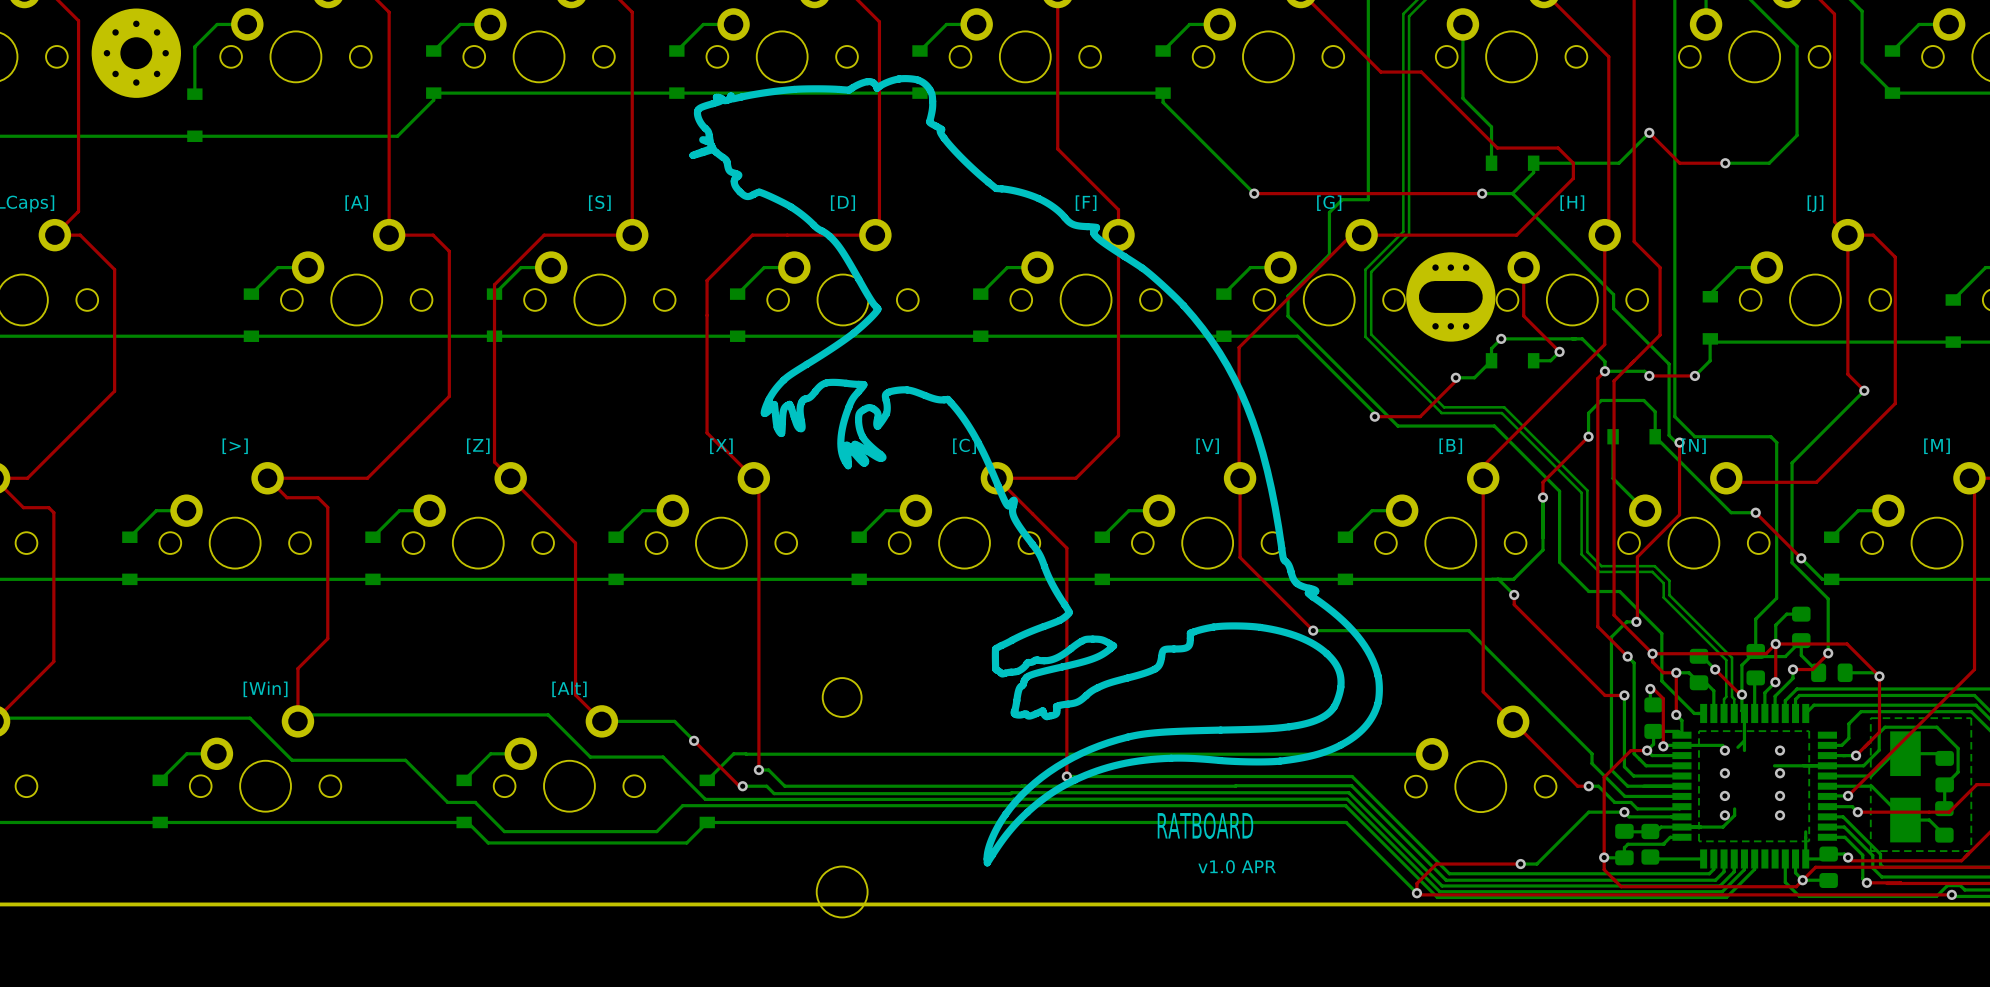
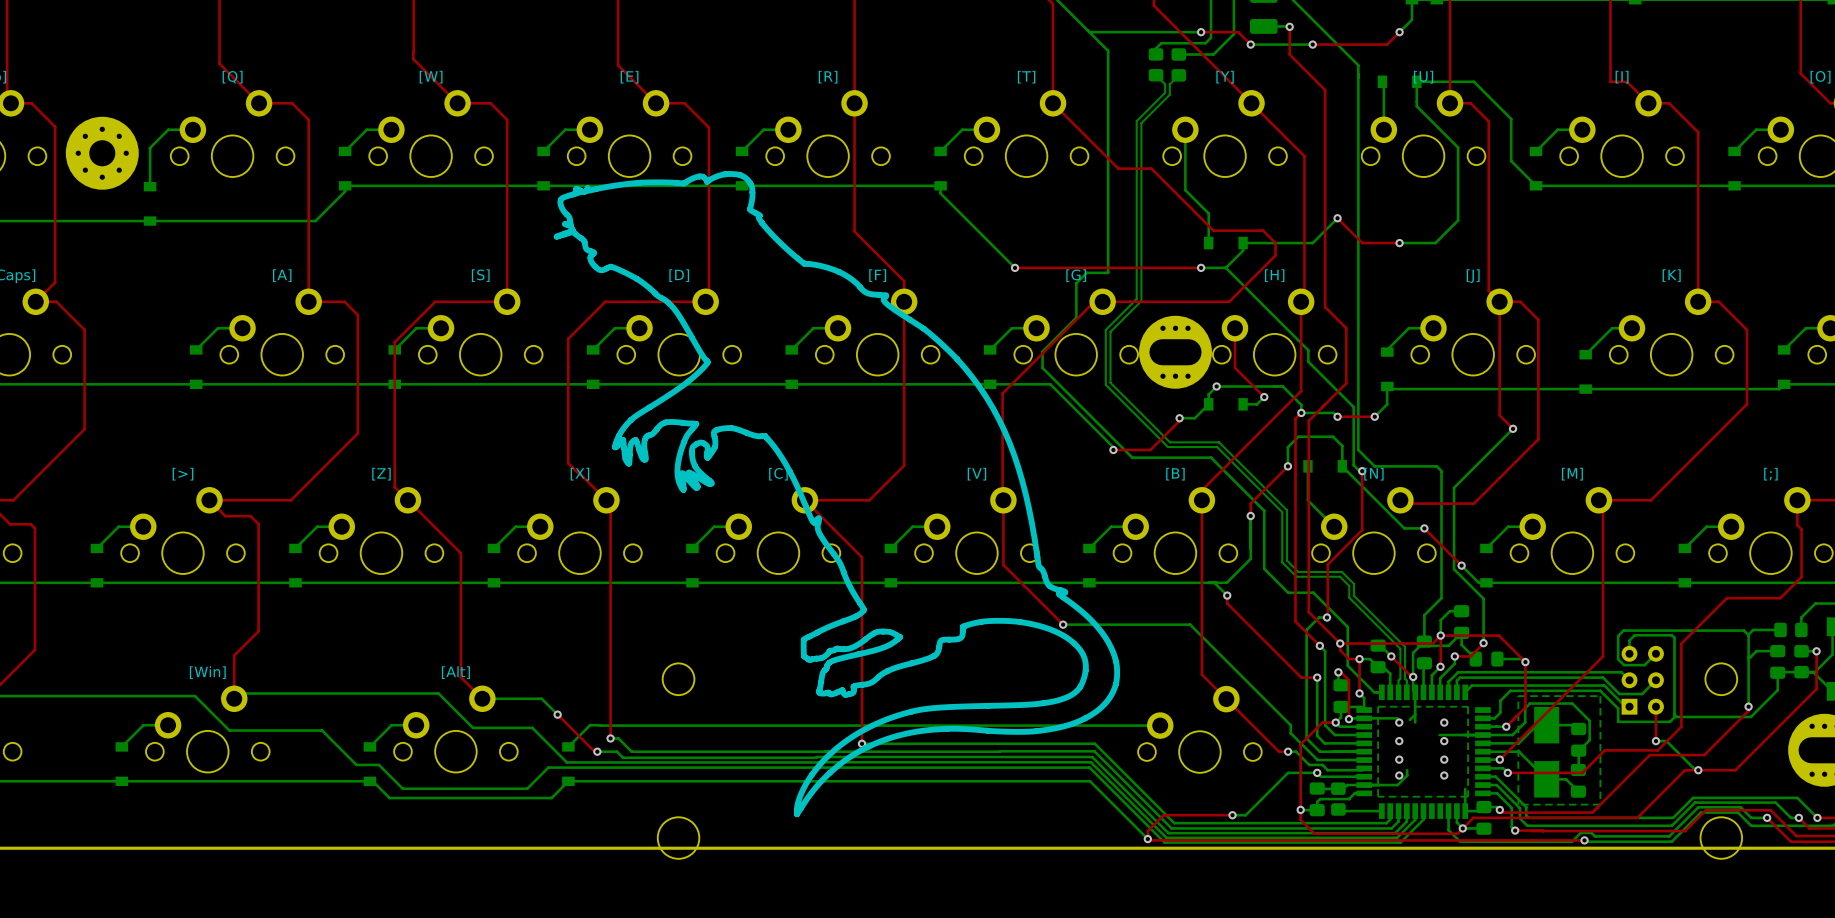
text: RATBOARD (1205, 825) -> none
text: v1.0 APR (1237, 866) -> none

